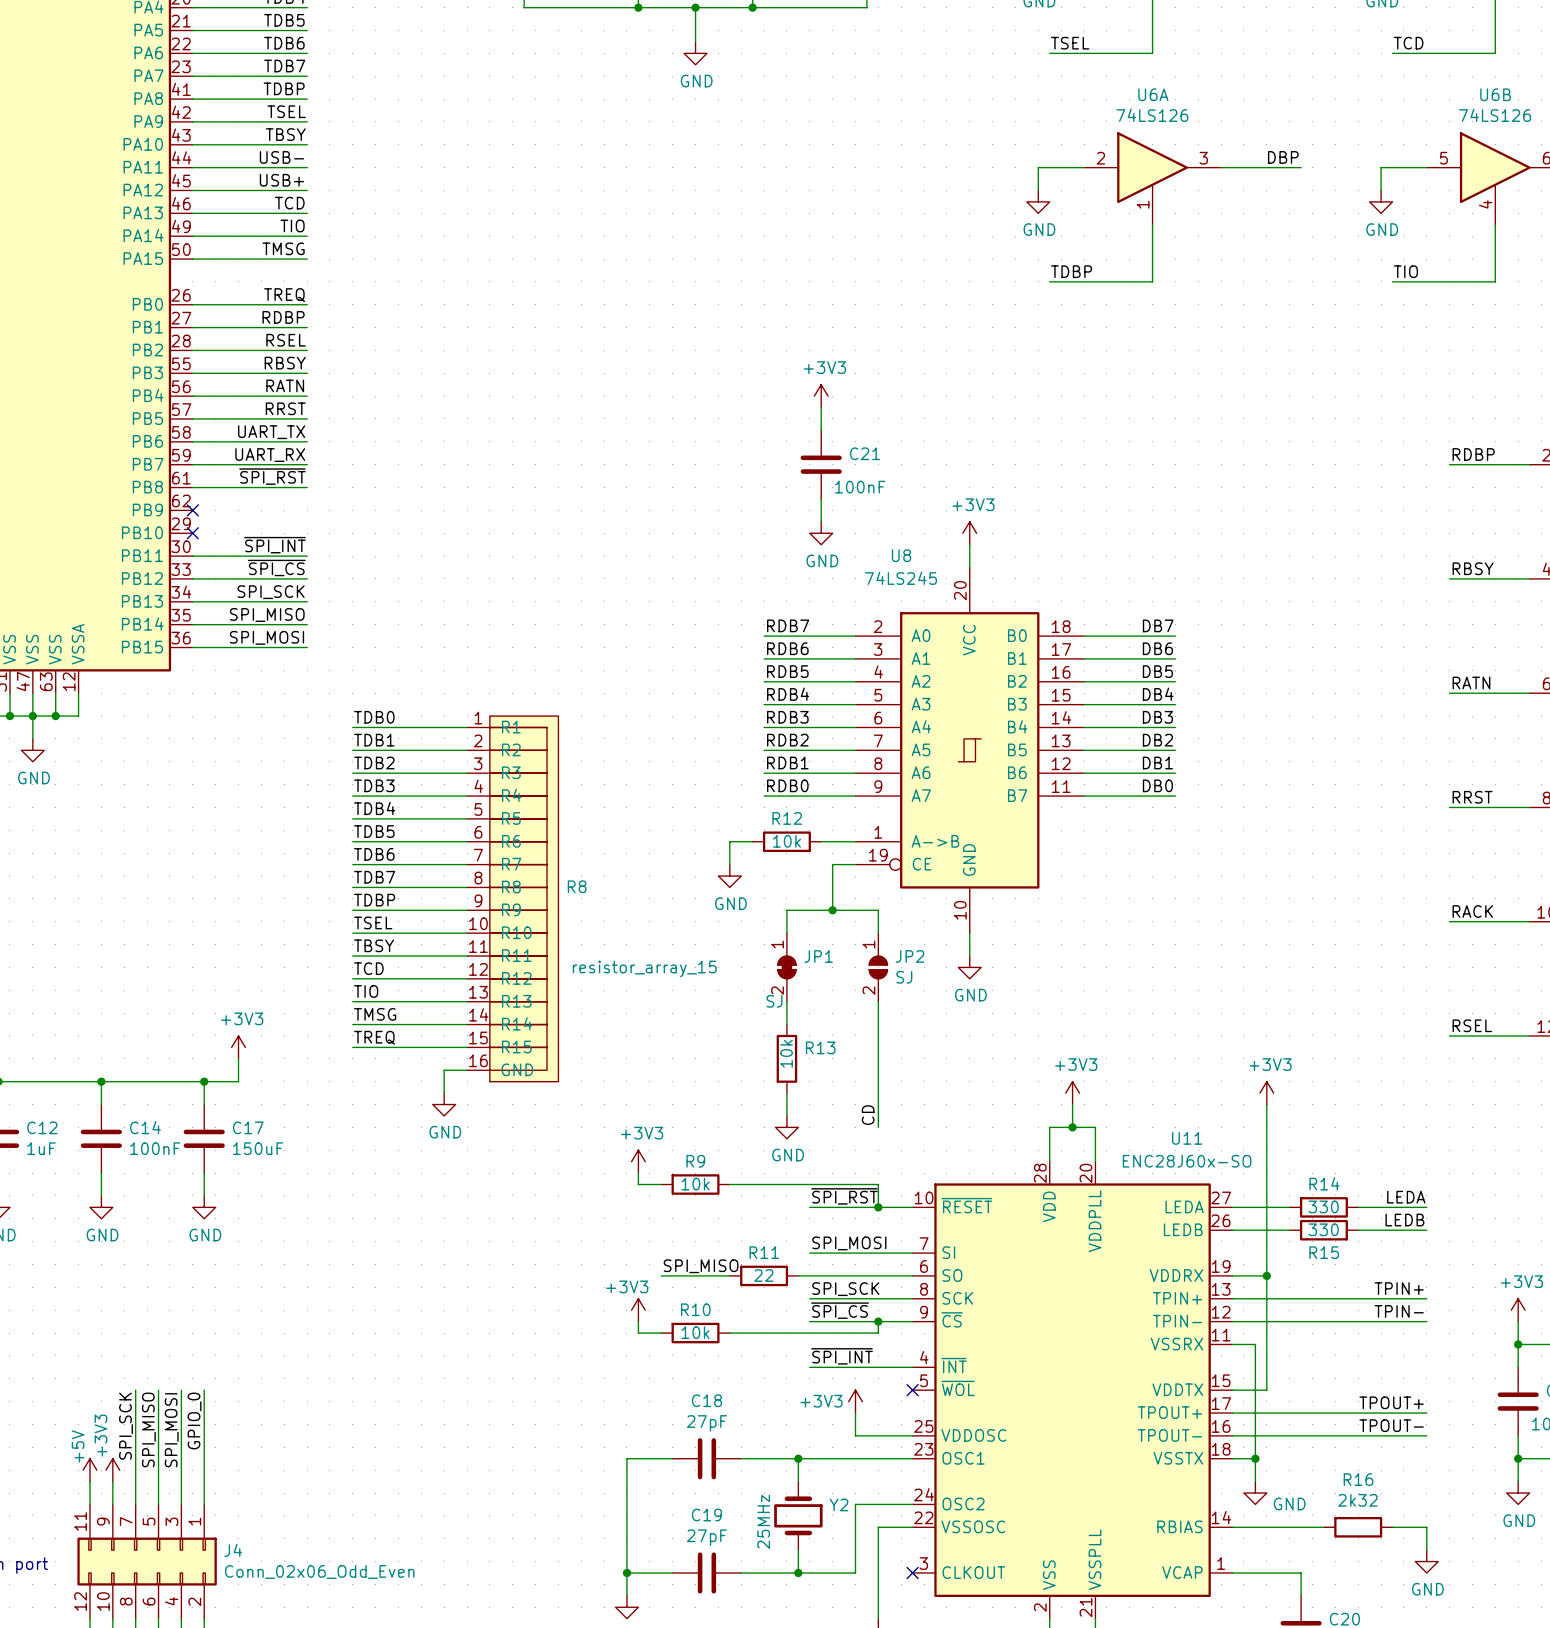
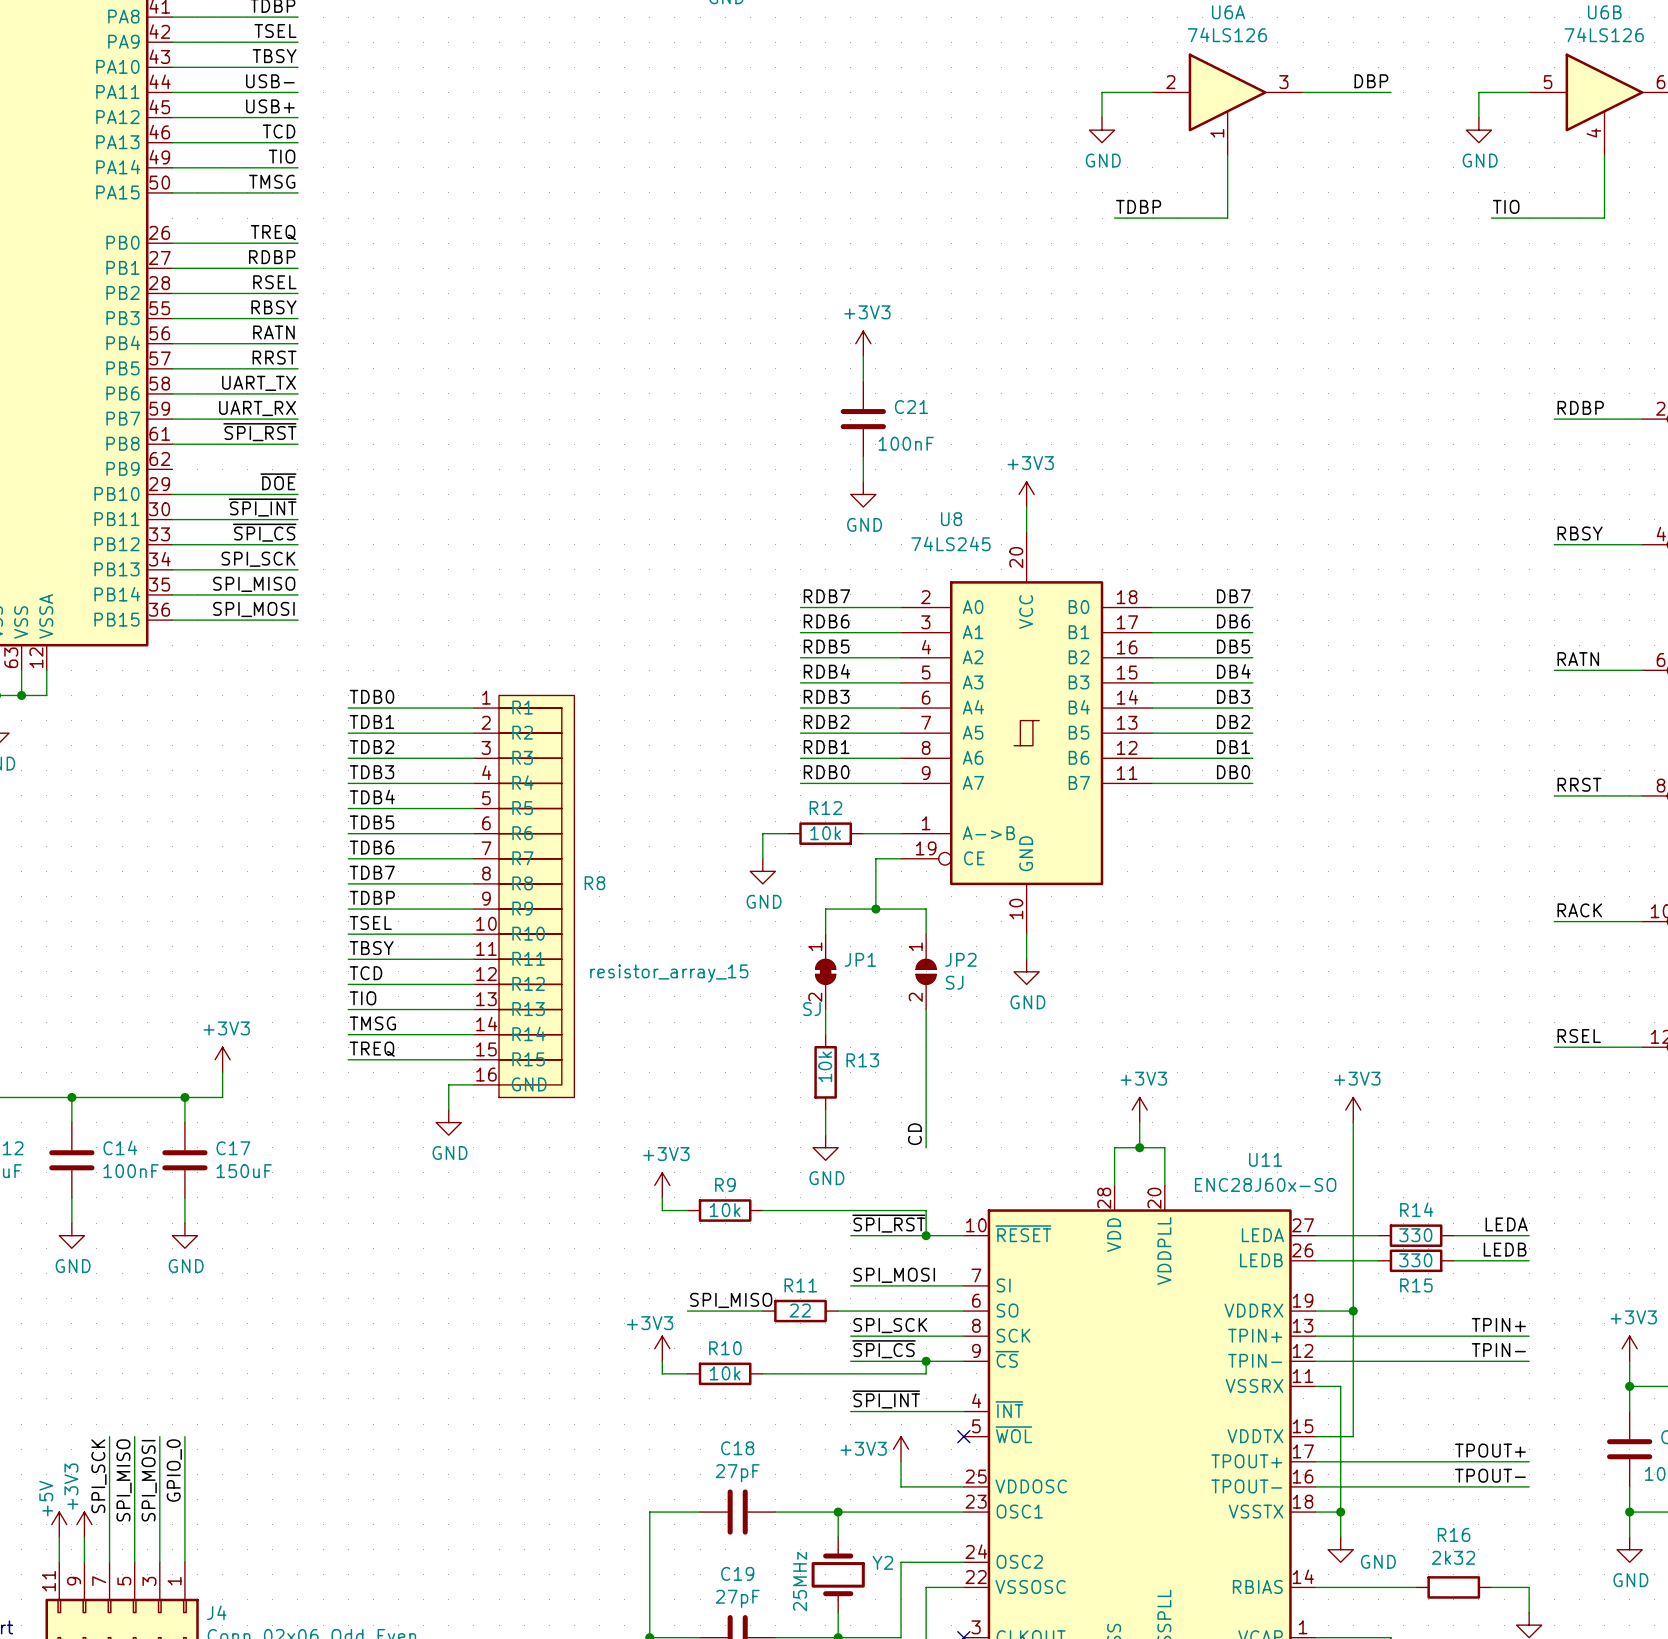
no-connect mark: (192, 510) -> none
label: none -> ~{DOE} (278, 481)
wire: none -> (172, 494) (297, 494)
no-connect mark: (192, 533) -> none

